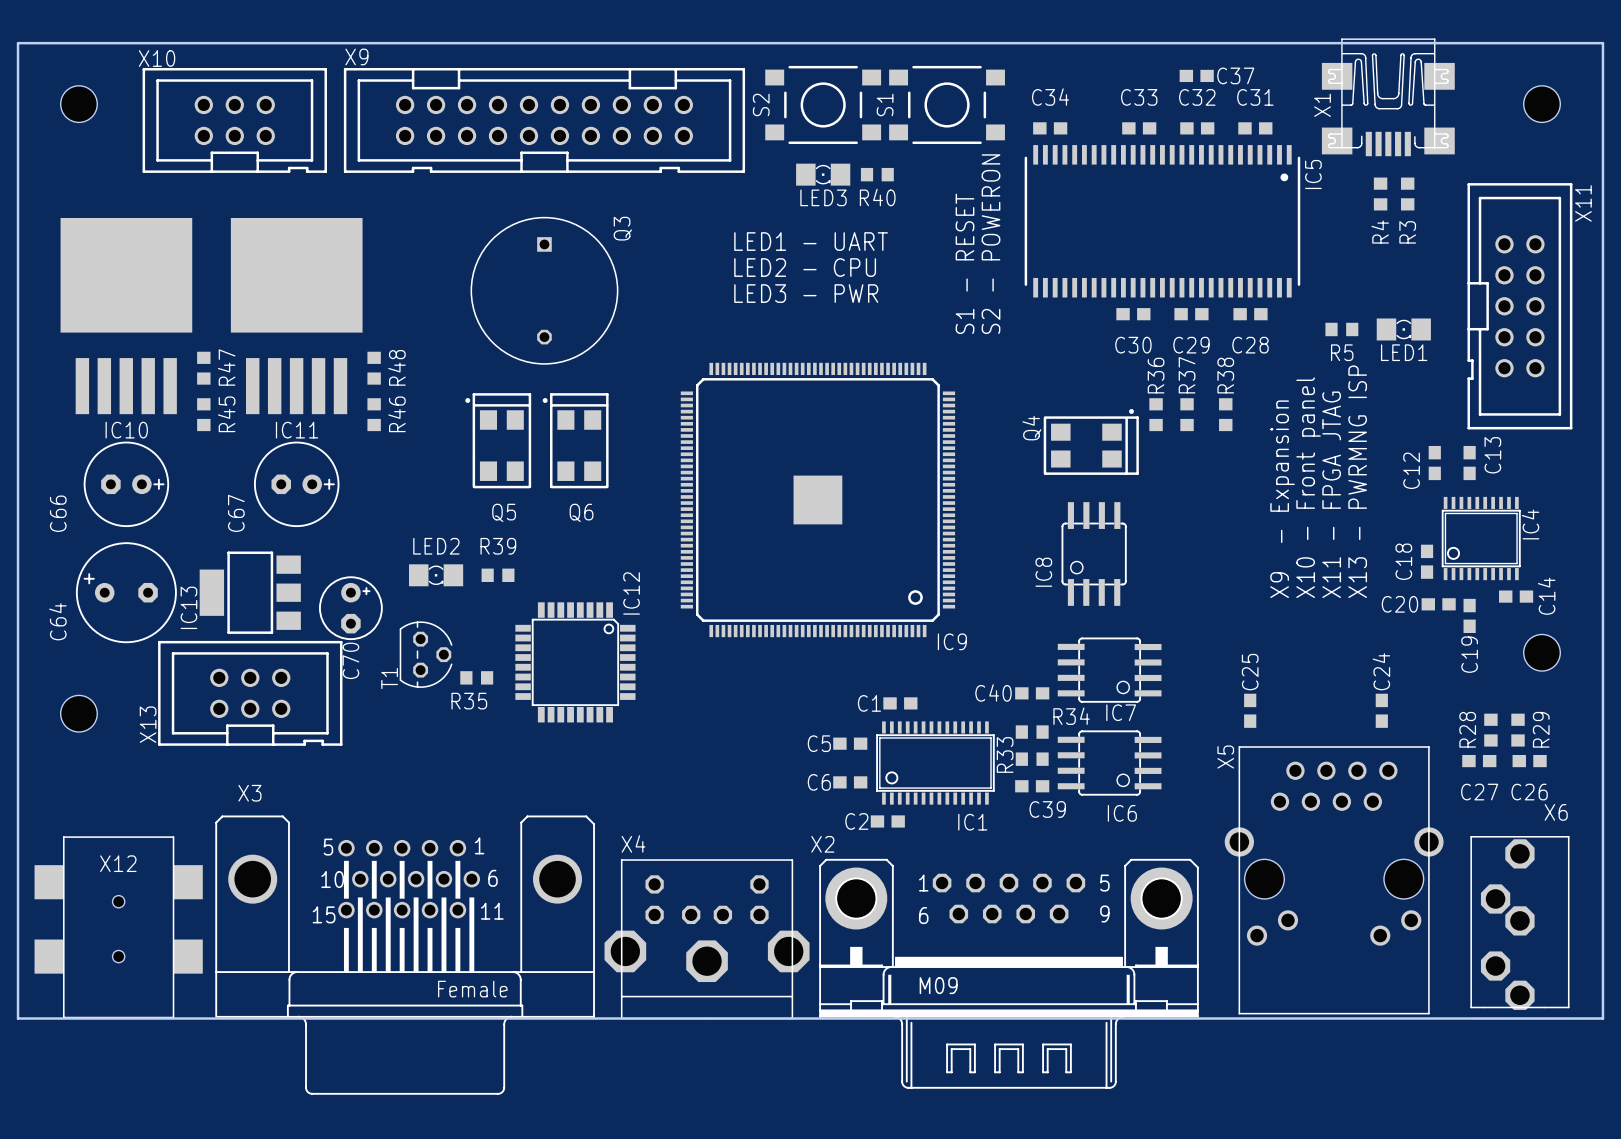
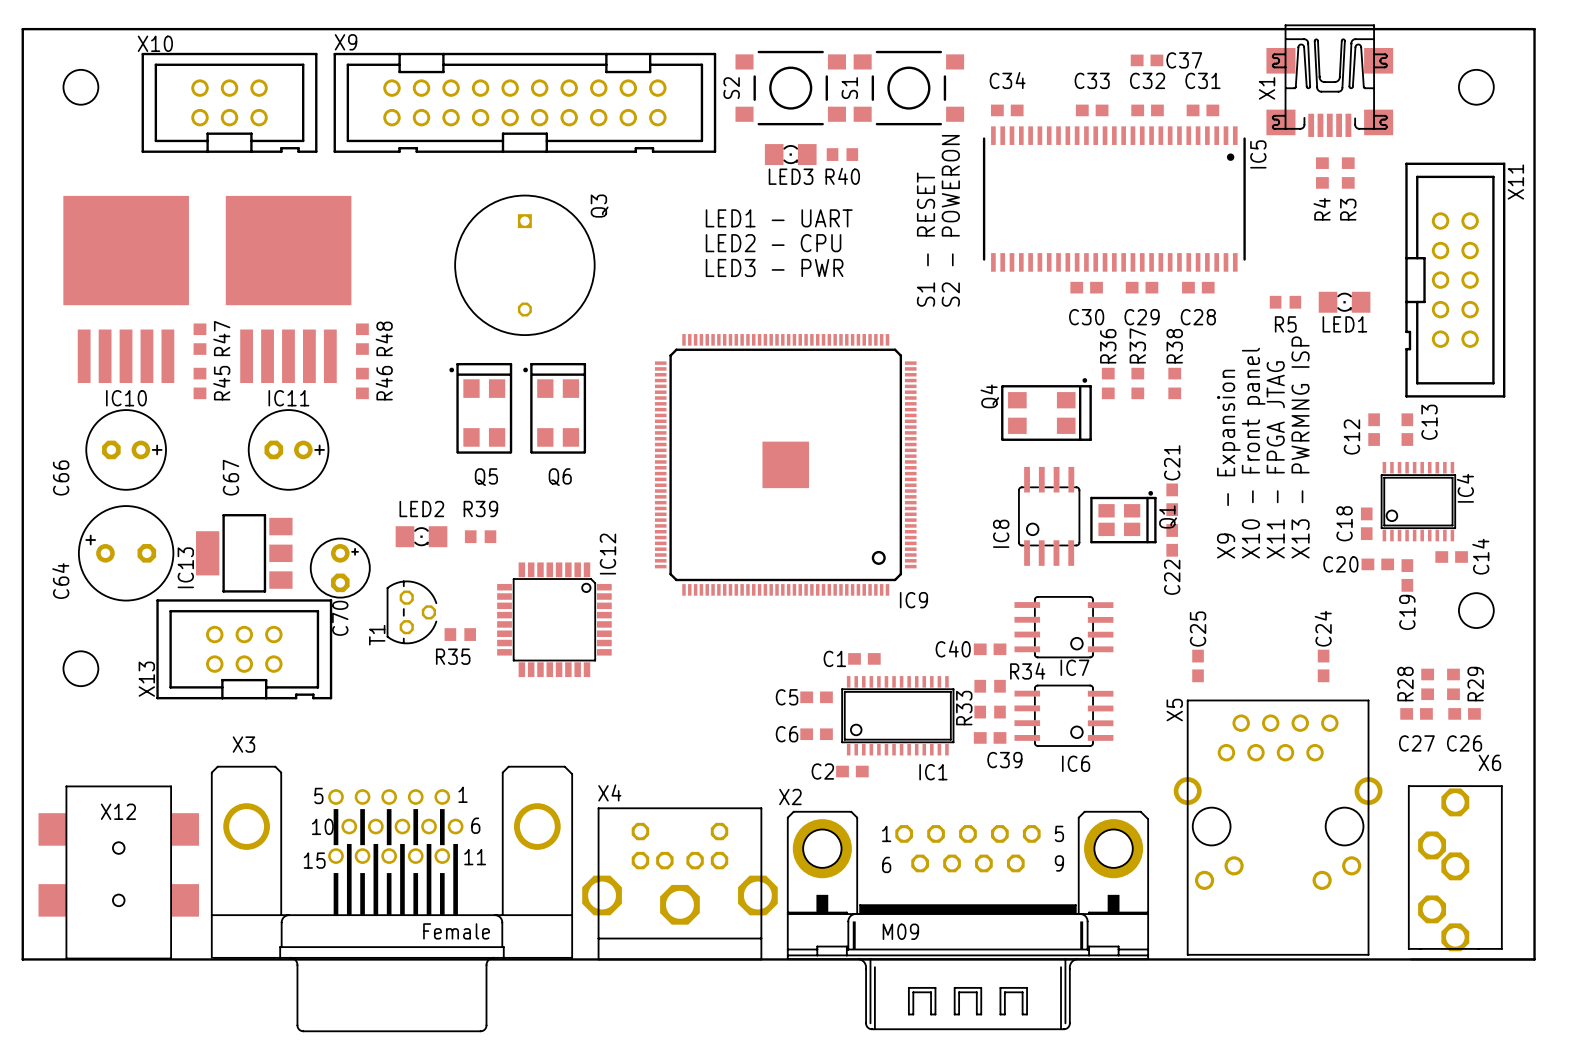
C21: none -> (1172, 499)
Q1: none -> (1123, 517)
C22: none -> (1172, 540)
X2 footprint: [819, 858, 1199, 1089] -> [786, 810, 1150, 1031]
X4 footprint: [604, 859, 810, 1020] -> [582, 807, 778, 961]

